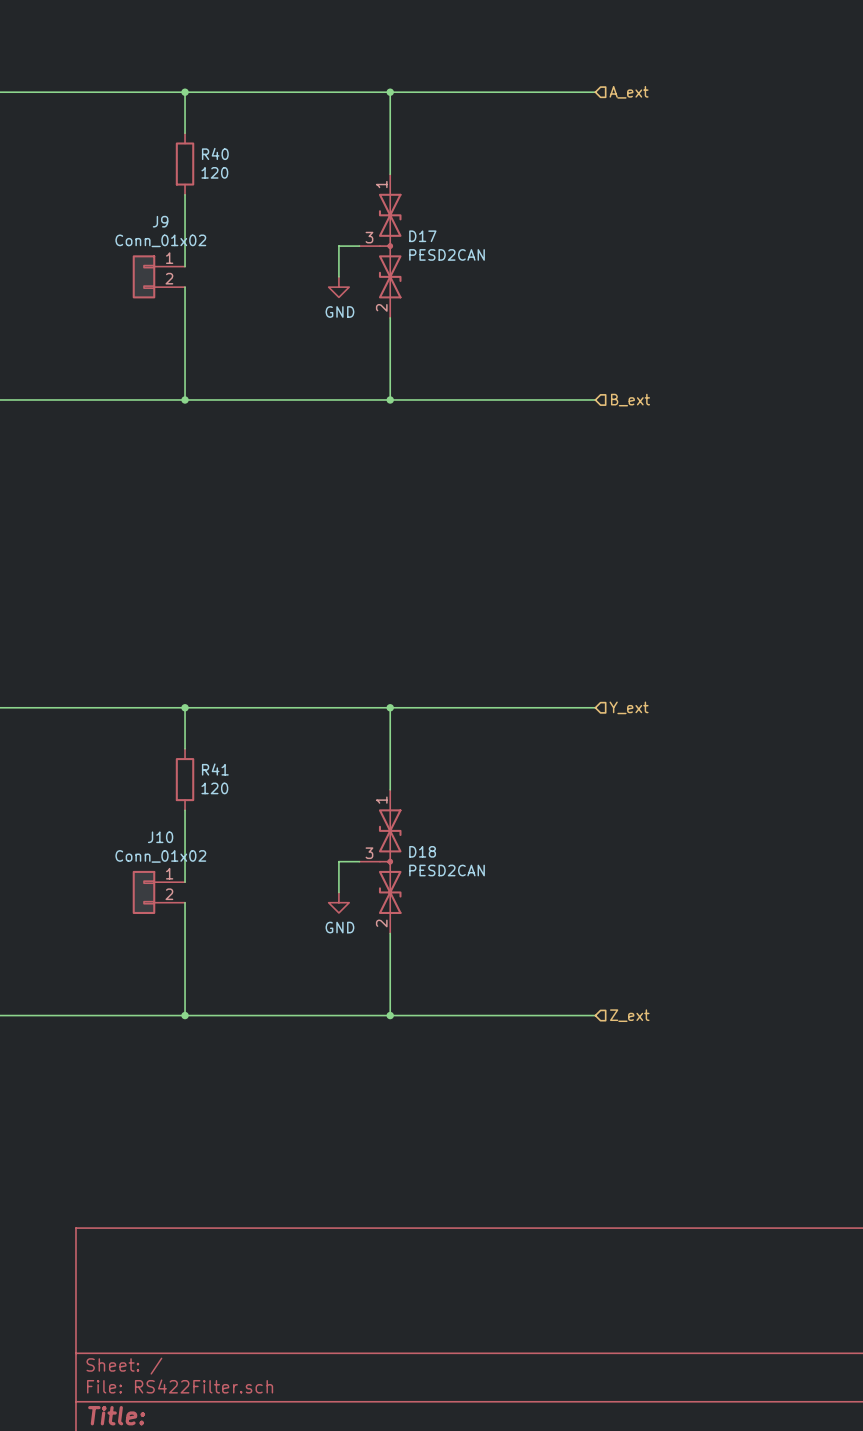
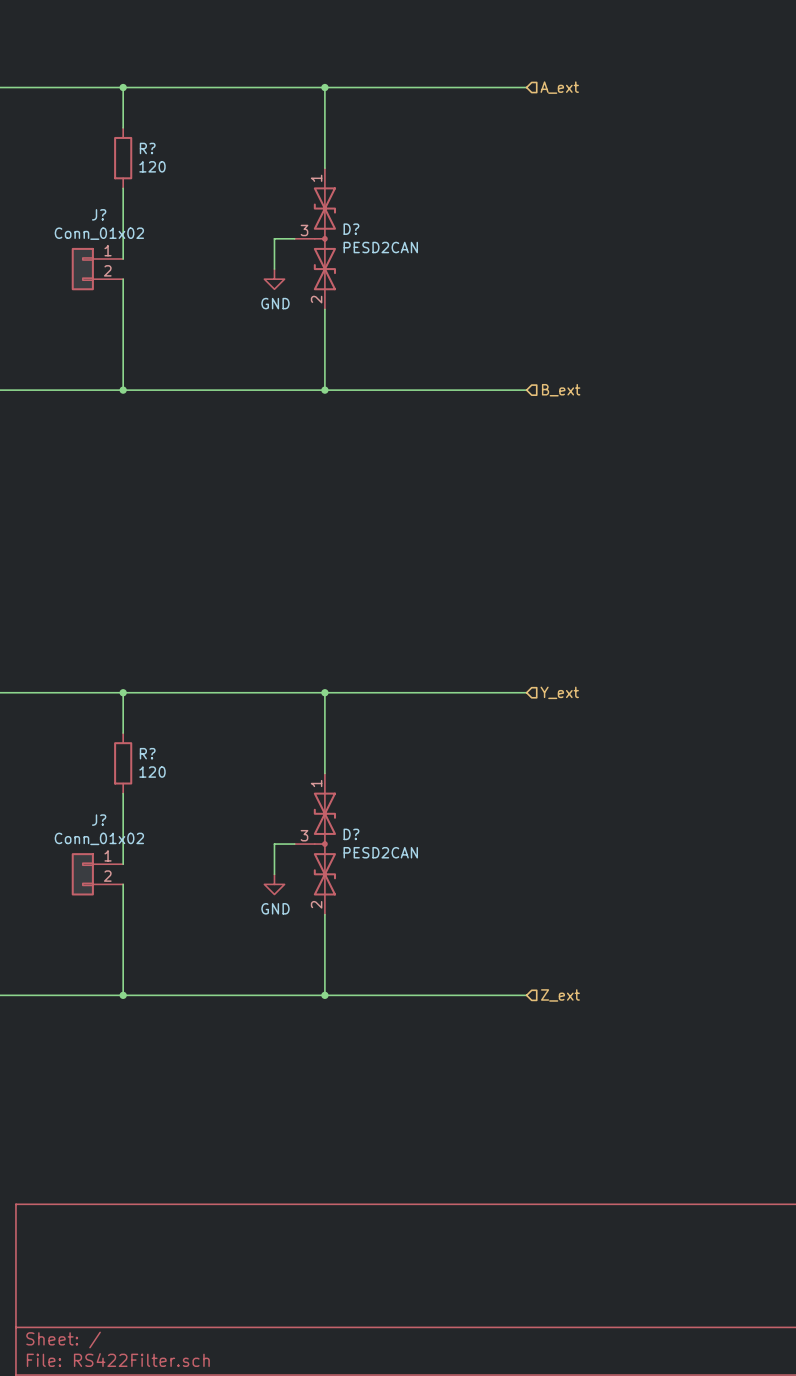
R40 name: R40 (215, 153) -> R? (147, 148)
J9 name: J9 (160, 221) -> J? (99, 214)
D17 name: D17 (422, 236) -> D? (351, 229)
R41 name: R41 (215, 769) -> R? (147, 753)
J10 name: J10 (160, 837) -> J? (99, 820)
D18 name: D18 (422, 851) -> D? (351, 834)

